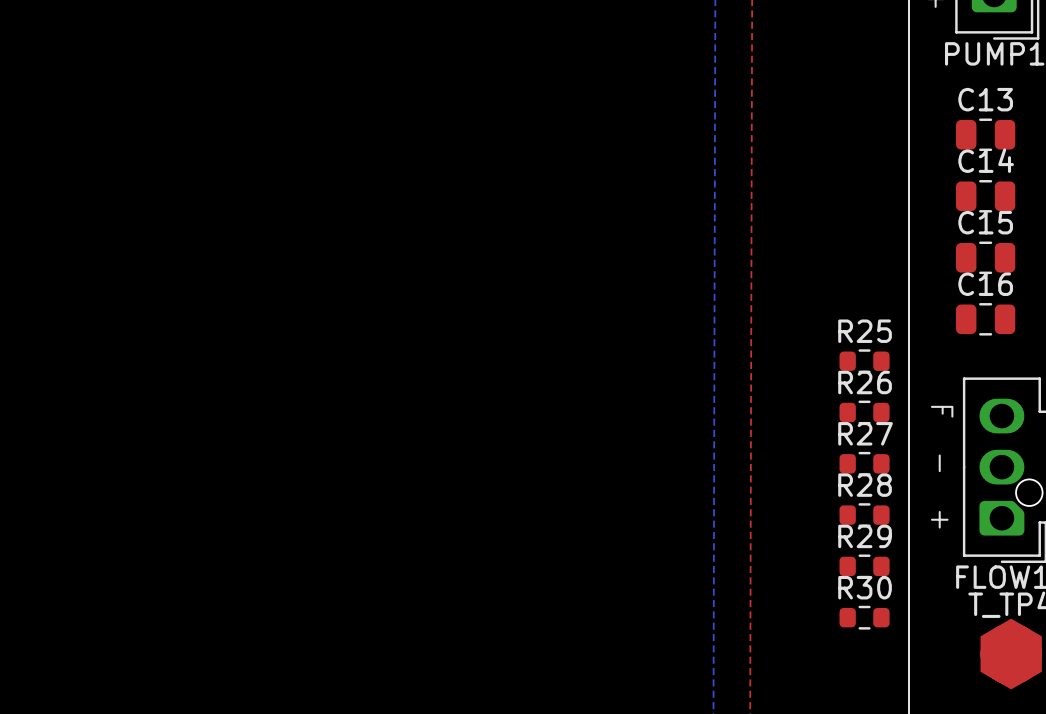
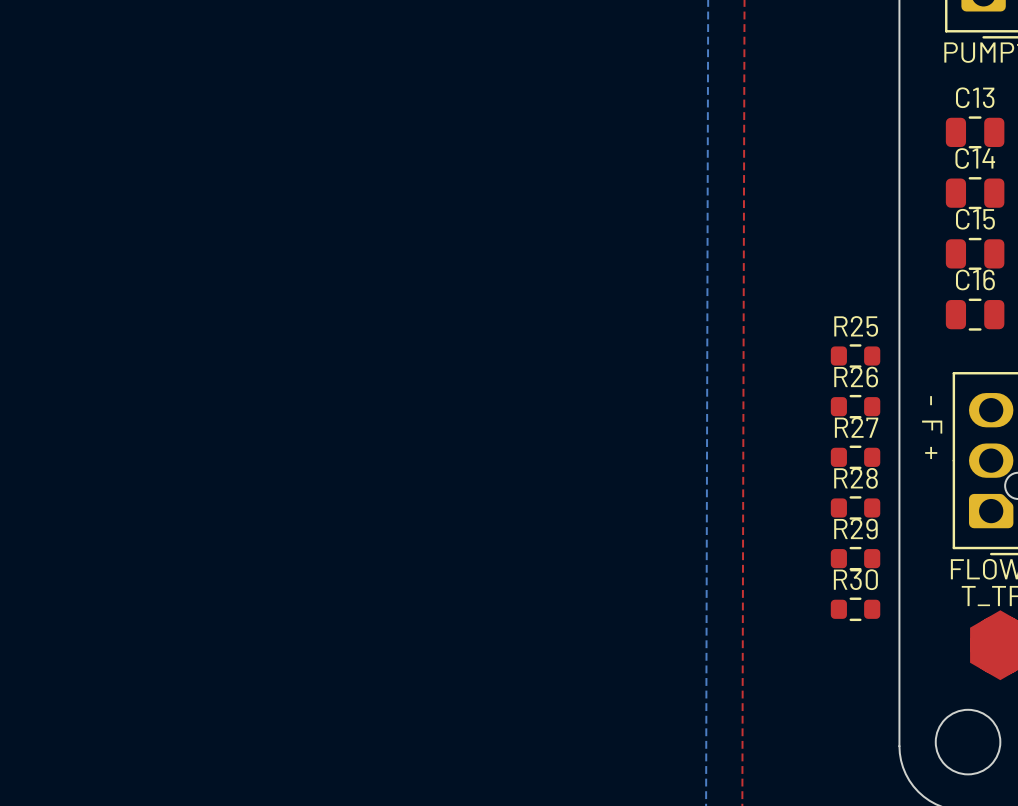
text: F - + (942, 467) -> - F + (932, 427)

